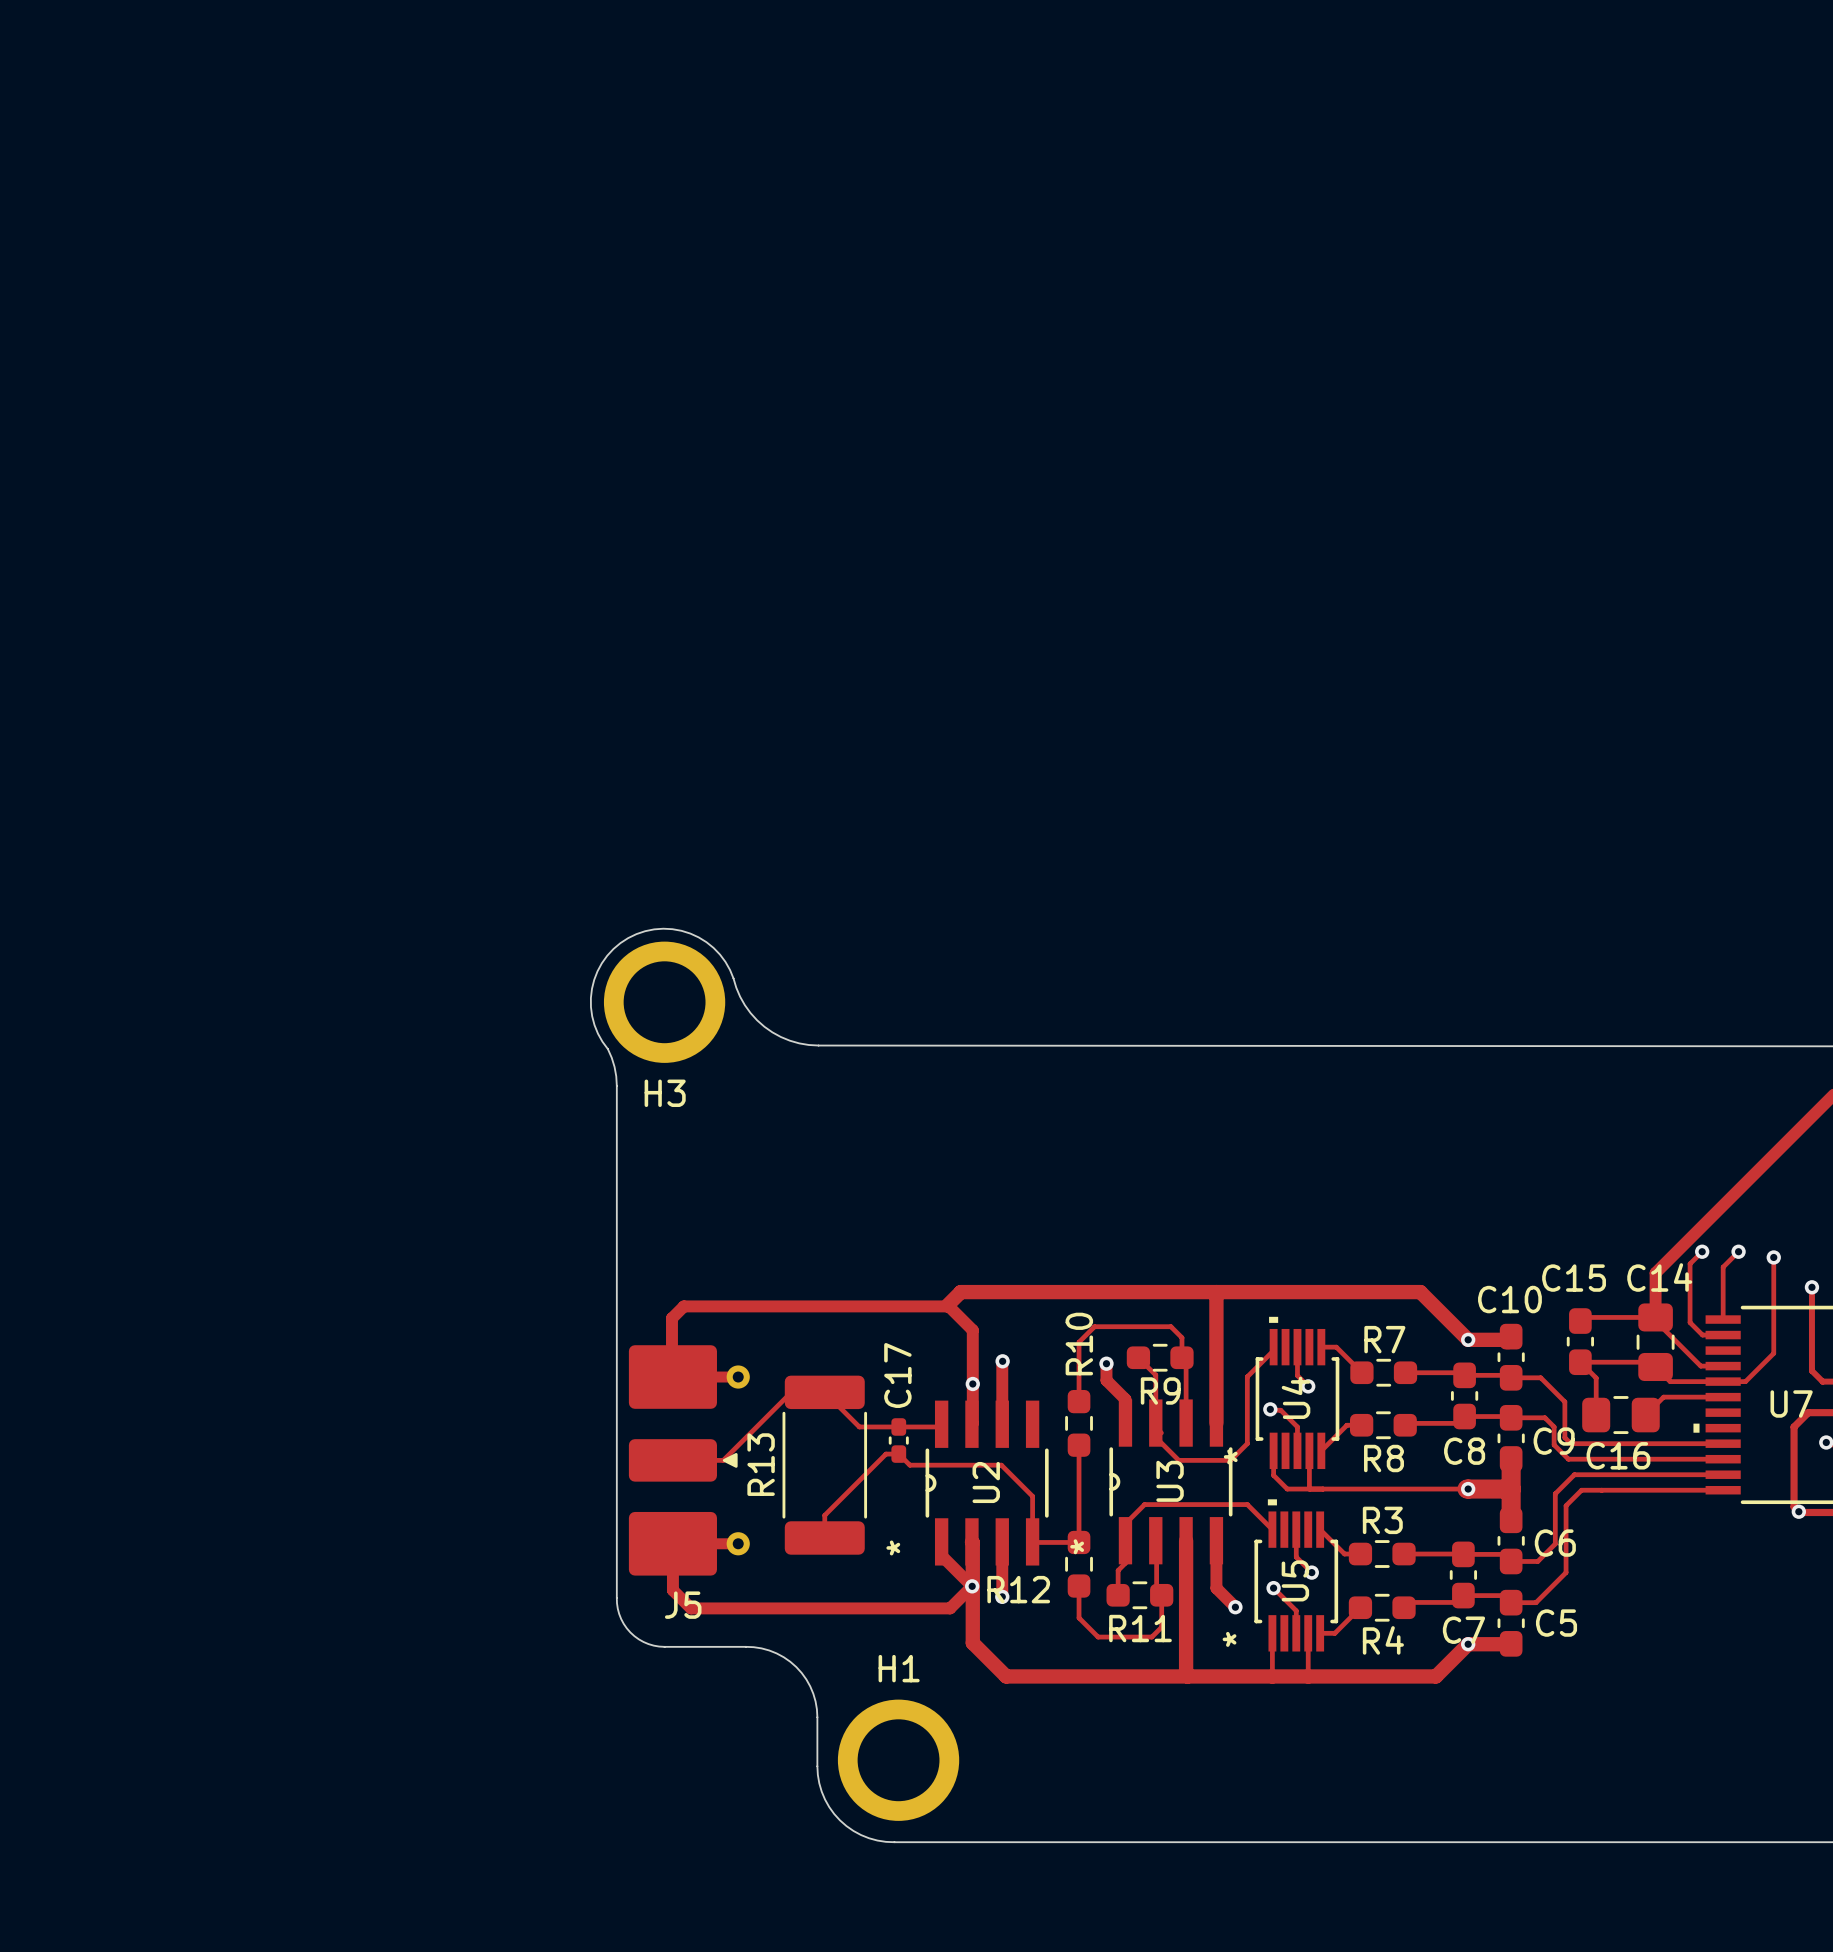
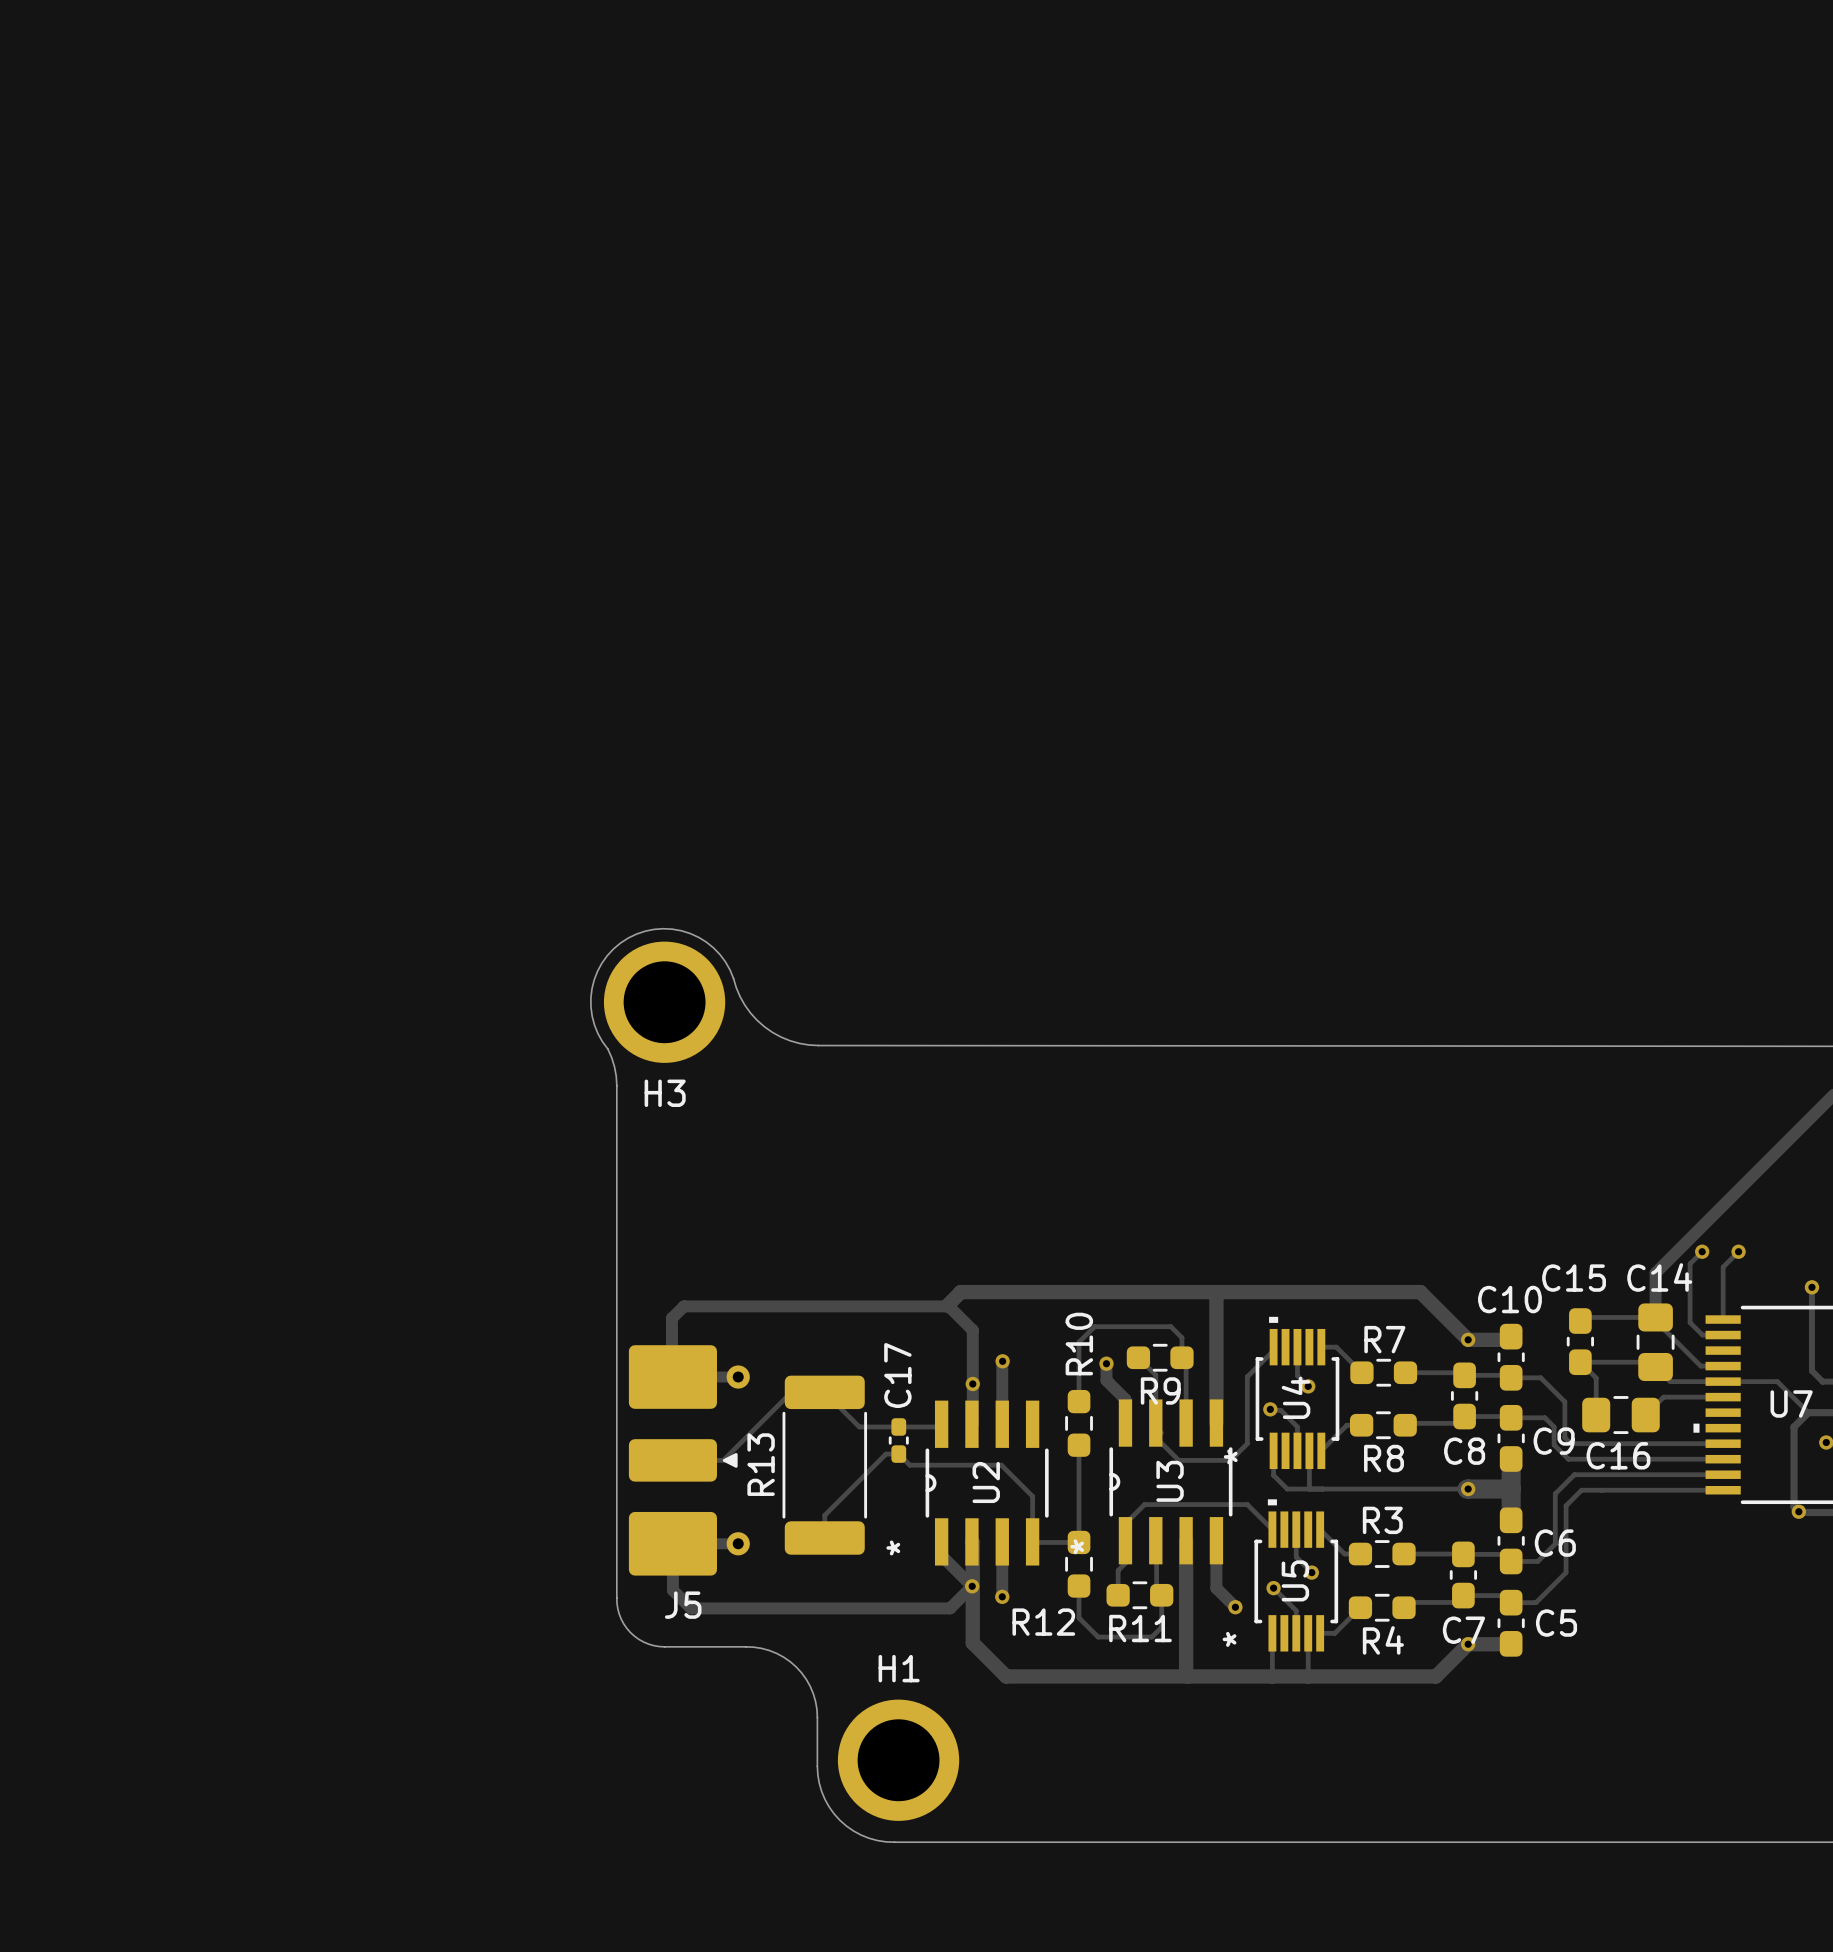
track: (1773, 1257) (1773, 1353) (1745, 1381) -> (1808, 1412) (1777, 1381) (1745, 1381)
via: (1773, 1257) -> none
R12 name position: R12 (1018, 1589) -> R12 (1043, 1622)

